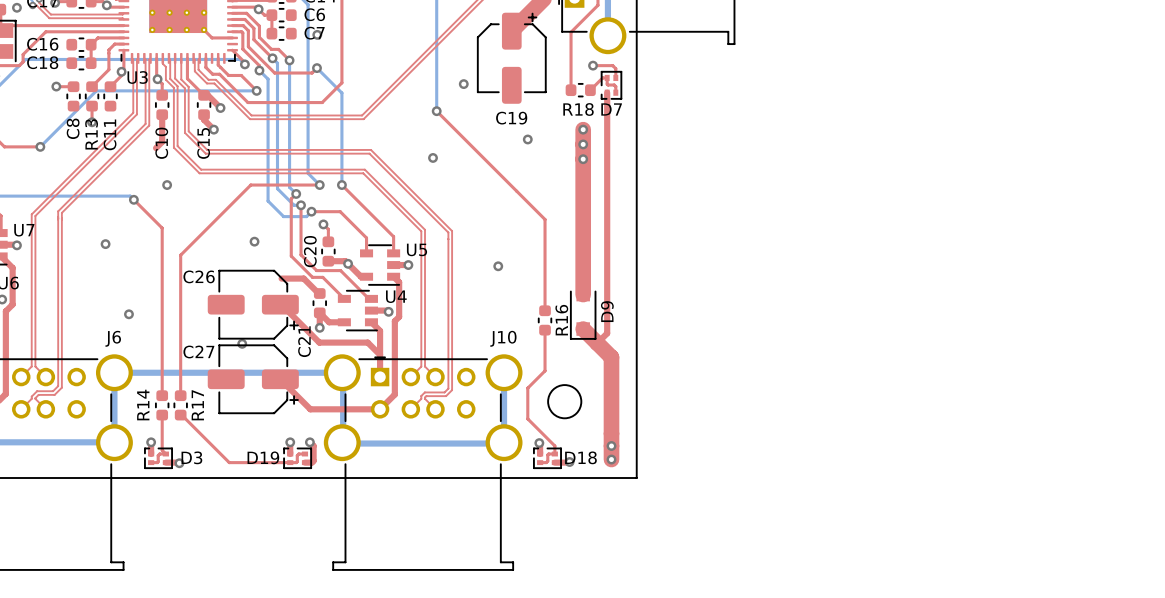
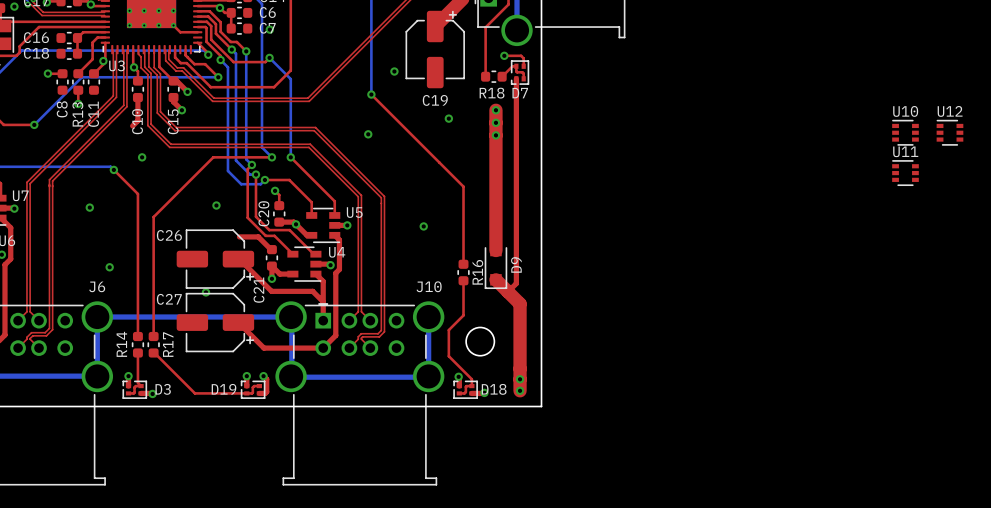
U10: none -> (905, 132)
U12: none -> (949, 132)
U11: none -> (905, 173)

